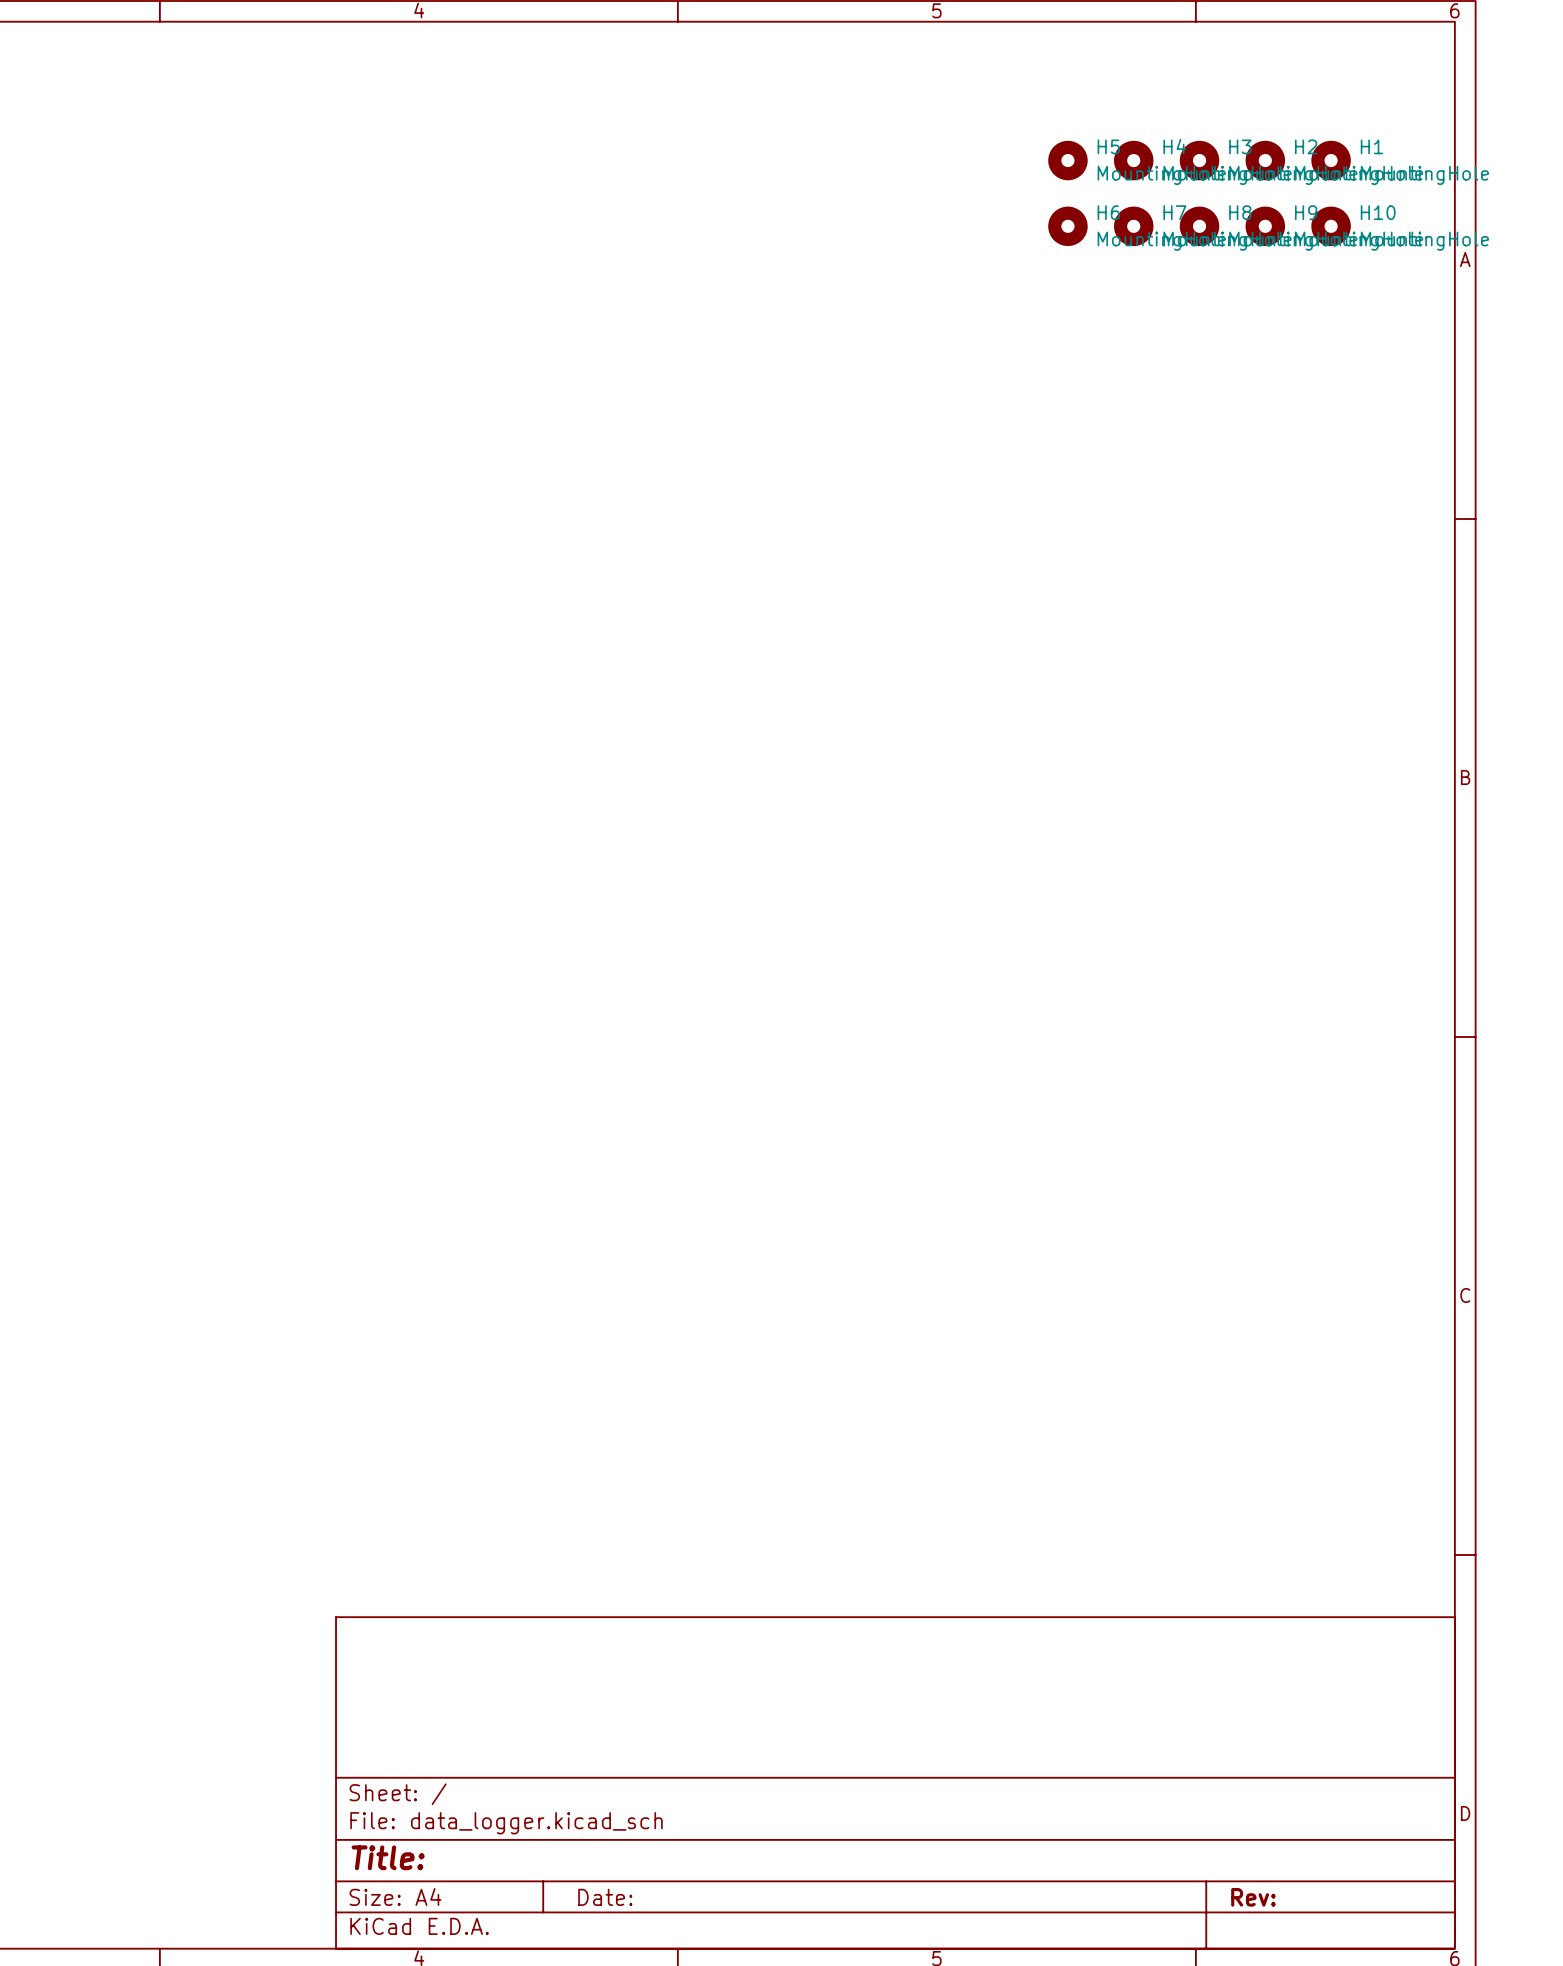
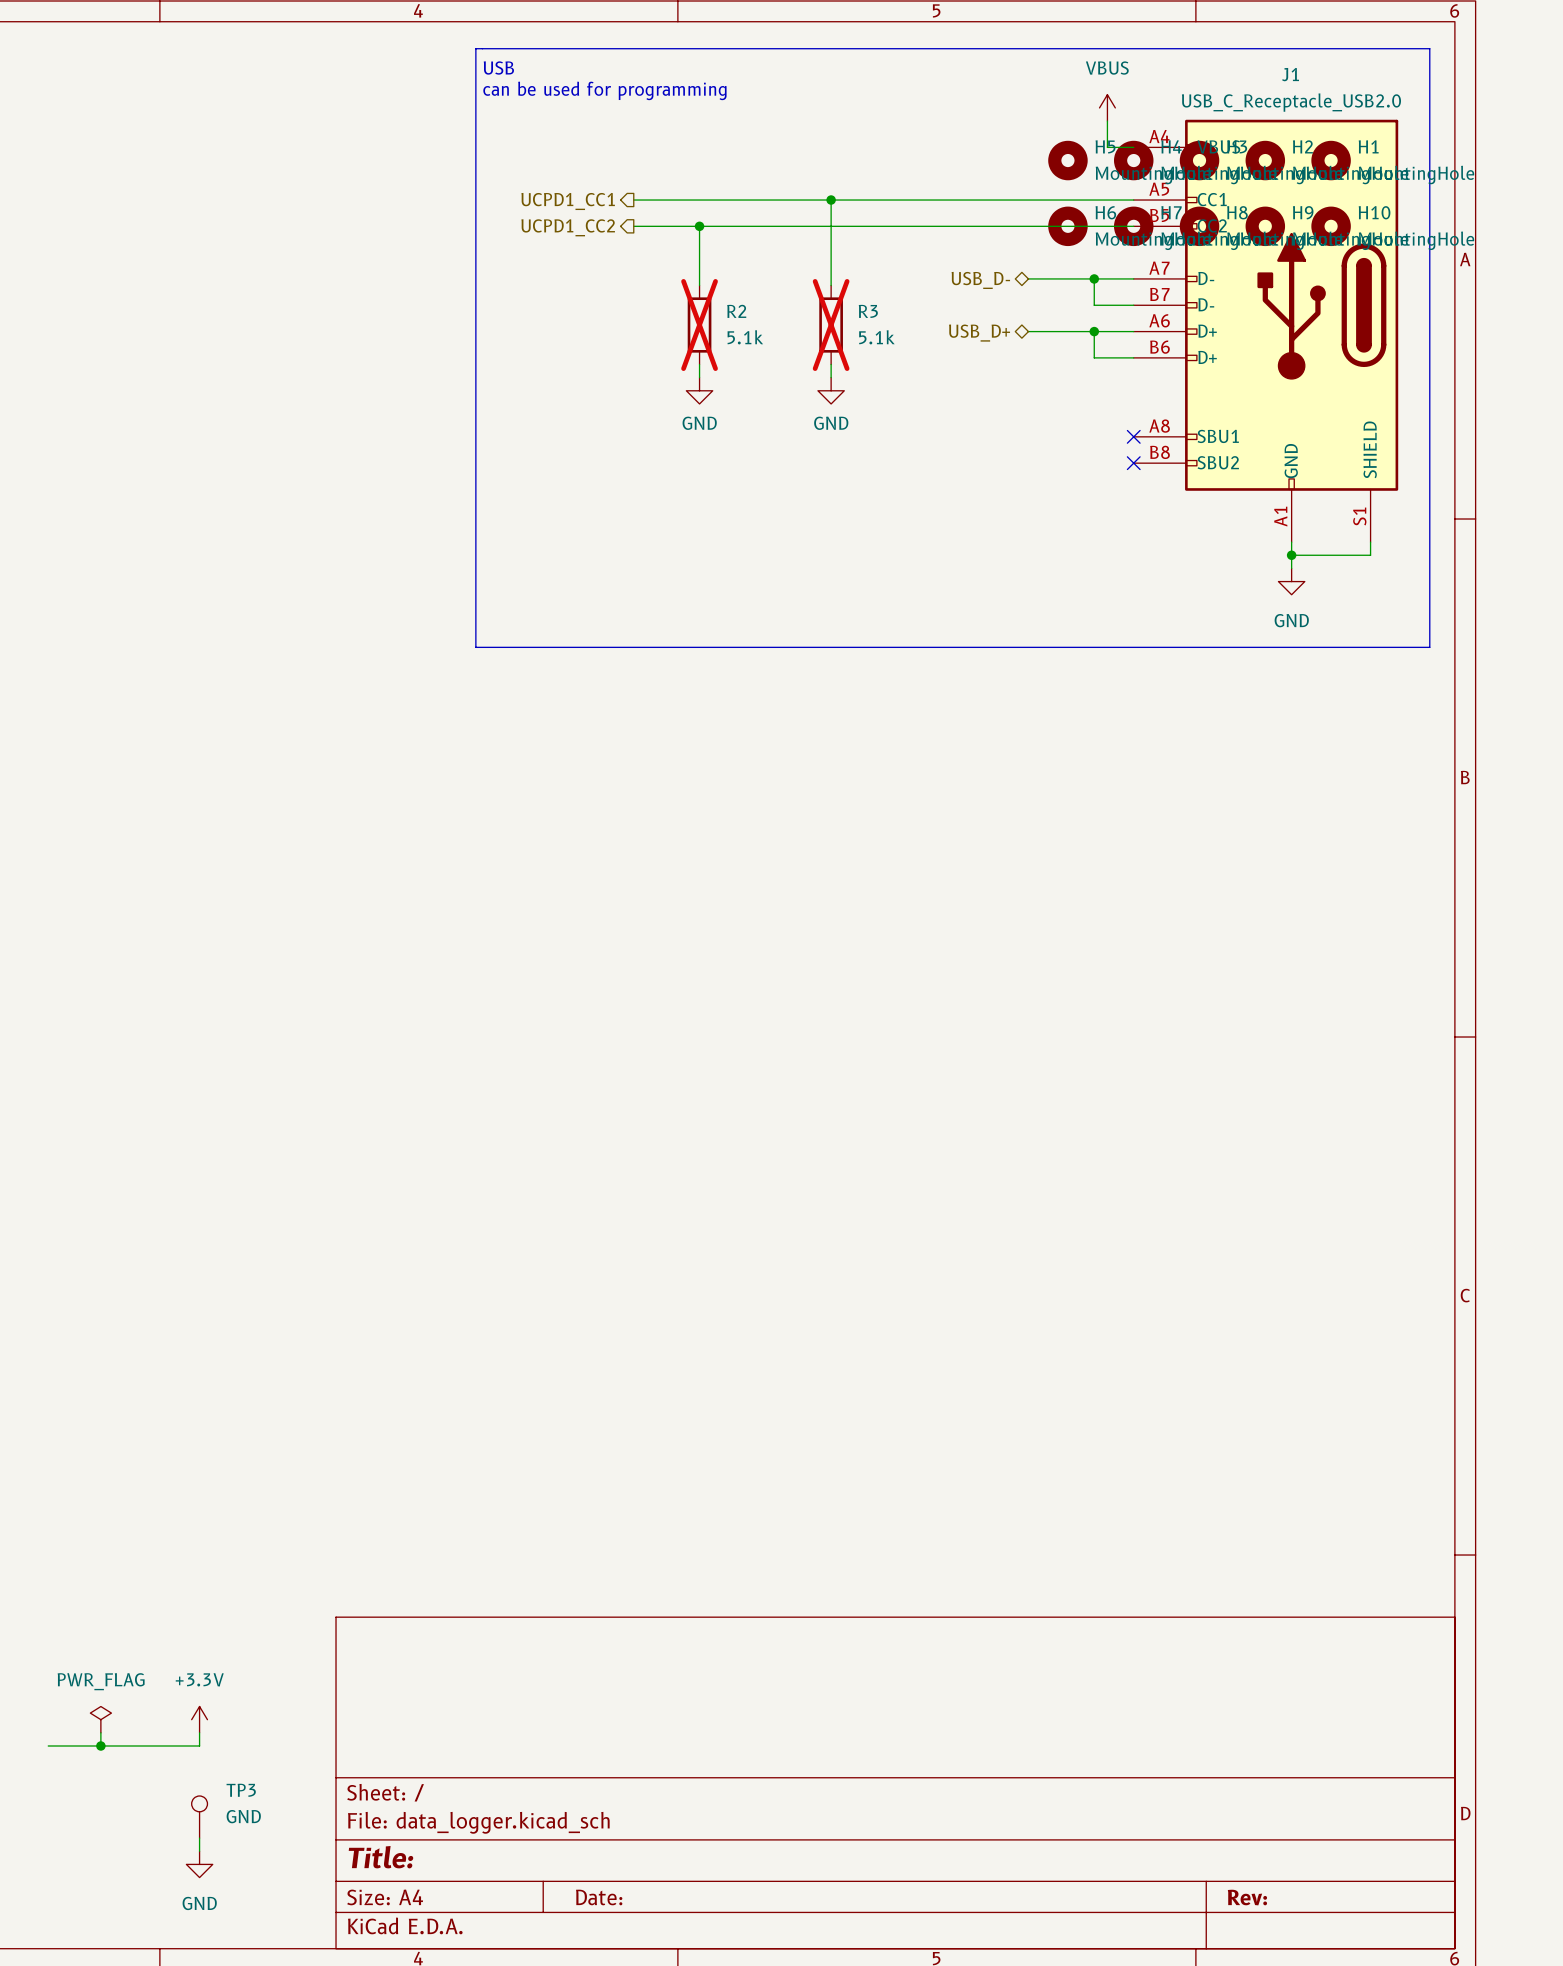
line: none -> (475, 48) (475, 647) (1429, 647) (1429, 48) (475, 48)
text: none -> USB (498, 68)
text: none -> can be used for programming (604, 90)
power symbol: none -> VBUS (1107, 107)
wire: none -> (1107, 121) (1107, 147) (1133, 147)
hierarchical label: none -> UCPD1_CC1 (568, 201)
wire: none -> (633, 200) (1133, 200)
wire: none -> (831, 200) (831, 285)
junction: none -> (831, 200)
hierarchical label: none -> UCPD1_CC2 (568, 227)
wire: none -> (633, 226) (1133, 226)
wire: none -> (699, 226) (699, 285)
junction: none -> (699, 226)
wire: none -> (1028, 278) (1133, 278)
wire: none -> (1094, 278) (1094, 305) (1133, 305)
junction: none -> (1094, 278)
hierarchical label: none -> USB_D- (980, 280)
R2: none -> 5.1k (699, 325)
R3: none -> 5.1k (831, 325)
J1: none -> USB_C_Receptacle_USB2.0 (1265, 330)
hierarchical label: none -> USB_D+ (979, 333)
wire: none -> (1028, 331) (1133, 331)
wire: none -> (1094, 331) (1094, 357) (1133, 357)
junction: none -> (1094, 331)
wire: none -> (699, 364) (699, 377)
wire: none -> (831, 364) (831, 377)
power symbol: none -> GND (699, 390)
power symbol: none -> GND (831, 390)
no-connect mark: none -> (1133, 436)
no-connect mark: none -> (1133, 463)
wire: none -> (1291, 542) (1291, 568)
wire: none -> (1370, 542) (1370, 555) (1291, 555)
junction: none -> (1291, 555)
power symbol: none -> GND (1291, 581)
power symbol: none -> PWR_FLAG (100, 1719)
power symbol: none -> +3.3V (199, 1719)
wire: none -> (100, 1732) (100, 1746)
wire: none -> (199, 1732) (199, 1746) (48, 1746)
junction: none -> (100, 1746)
TP3: none -> GND (199, 1817)
wire: none -> (199, 1838) (199, 1851)
power symbol: none -> GND (199, 1864)

